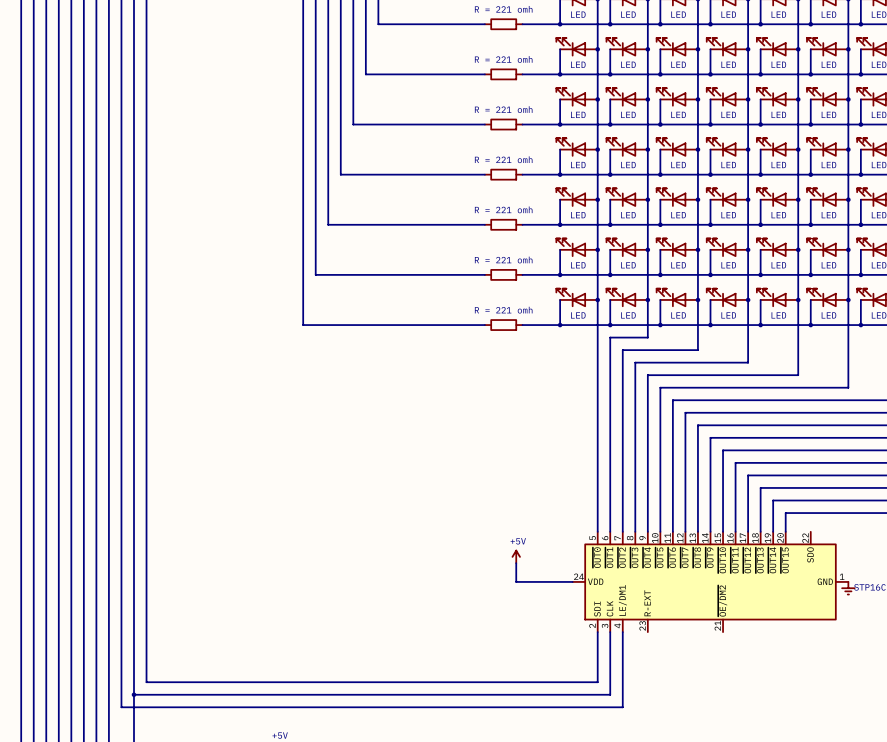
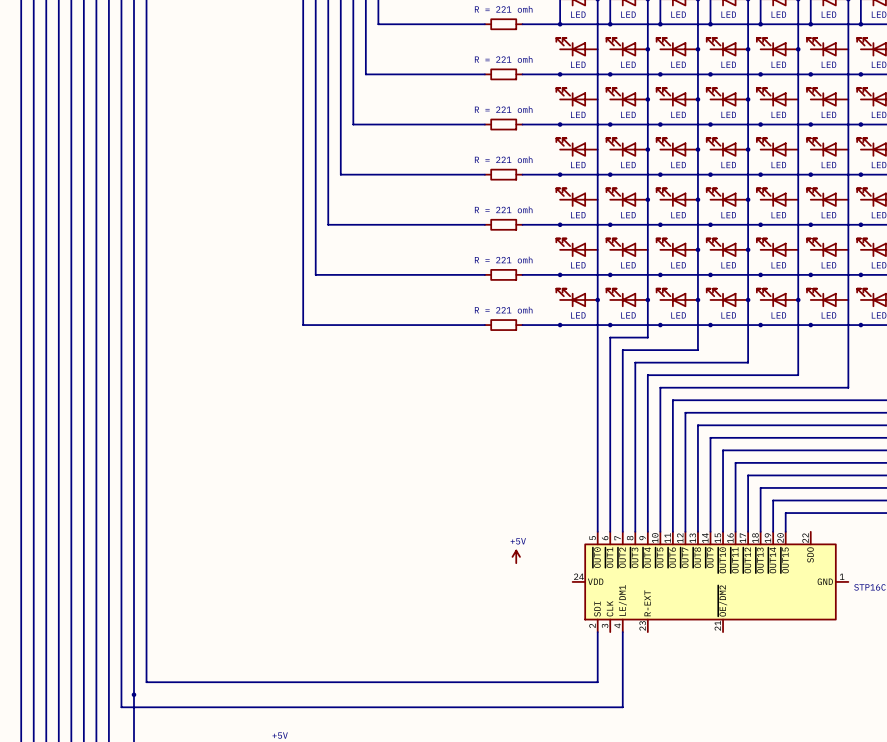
wire: (560, 49) (560, 74) -> none
junction: (597, 49) -> none
wire: (610, 49) (610, 74) -> none
wire: (660, 49) (660, 74) -> none
wire: (710, 49) (710, 74) -> none
wire: (760, 49) (760, 74) -> none
wire: (810, 49) (810, 74) -> none
junction: (848, 49) -> none
wire: (860, 49) (860, 74) -> none
wire: (560, 99) (560, 124) -> none
junction: (597, 99) -> none
wire: (610, 99) (610, 124) -> none
wire: (660, 99) (660, 124) -> none
wire: (710, 99) (710, 124) -> none
wire: (760, 99) (760, 124) -> none
junction: (798, 99) -> none
wire: (810, 99) (810, 124) -> none
junction: (848, 99) -> none
wire: (860, 99) (860, 124) -> none
wire: (560, 149) (560, 174) -> none
junction: (597, 149) -> none
wire: (610, 149) (610, 174) -> none
wire: (660, 149) (660, 174) -> none
wire: (710, 149) (710, 174) -> none
wire: (760, 149) (760, 174) -> none
junction: (798, 149) -> none
wire: (810, 149) (810, 174) -> none
junction: (848, 149) -> none
wire: (860, 149) (860, 174) -> none
wire: (560, 199) (560, 224) -> none
junction: (597, 199) -> none
wire: (610, 199) (610, 224) -> none
wire: (660, 199) (660, 224) -> none
wire: (710, 199) (710, 224) -> none
wire: (760, 199) (760, 224) -> none
junction: (798, 199) -> none
wire: (810, 199) (810, 224) -> none
junction: (848, 199) -> none
wire: (860, 199) (860, 224) -> none
wire: (560, 249) (560, 274) -> none
junction: (597, 249) -> none
wire: (610, 249) (610, 274) -> none
junction: (647, 249) -> none
wire: (660, 249) (660, 274) -> none
wire: (710, 249) (710, 274) -> none
wire: (760, 249) (760, 274) -> none
junction: (798, 249) -> none
wire: (810, 249) (810, 274) -> none
junction: (848, 249) -> none
wire: (860, 249) (860, 274) -> none
wire: (560, 299) (560, 325) -> none
wire: (610, 299) (610, 325) -> none
wire: (660, 299) (660, 325) -> none
wire: (710, 299) (710, 325) -> none
wire: (760, 299) (760, 325) -> none
wire: (810, 299) (810, 325) -> none
junction: (848, 299) -> none
wire: (860, 299) (860, 325) -> none
wire: (516, 563) (516, 581) (572, 581) -> none
power symbol: (848, 588) -> none
wire: (610, 632) (610, 694) (133, 694) -> none

